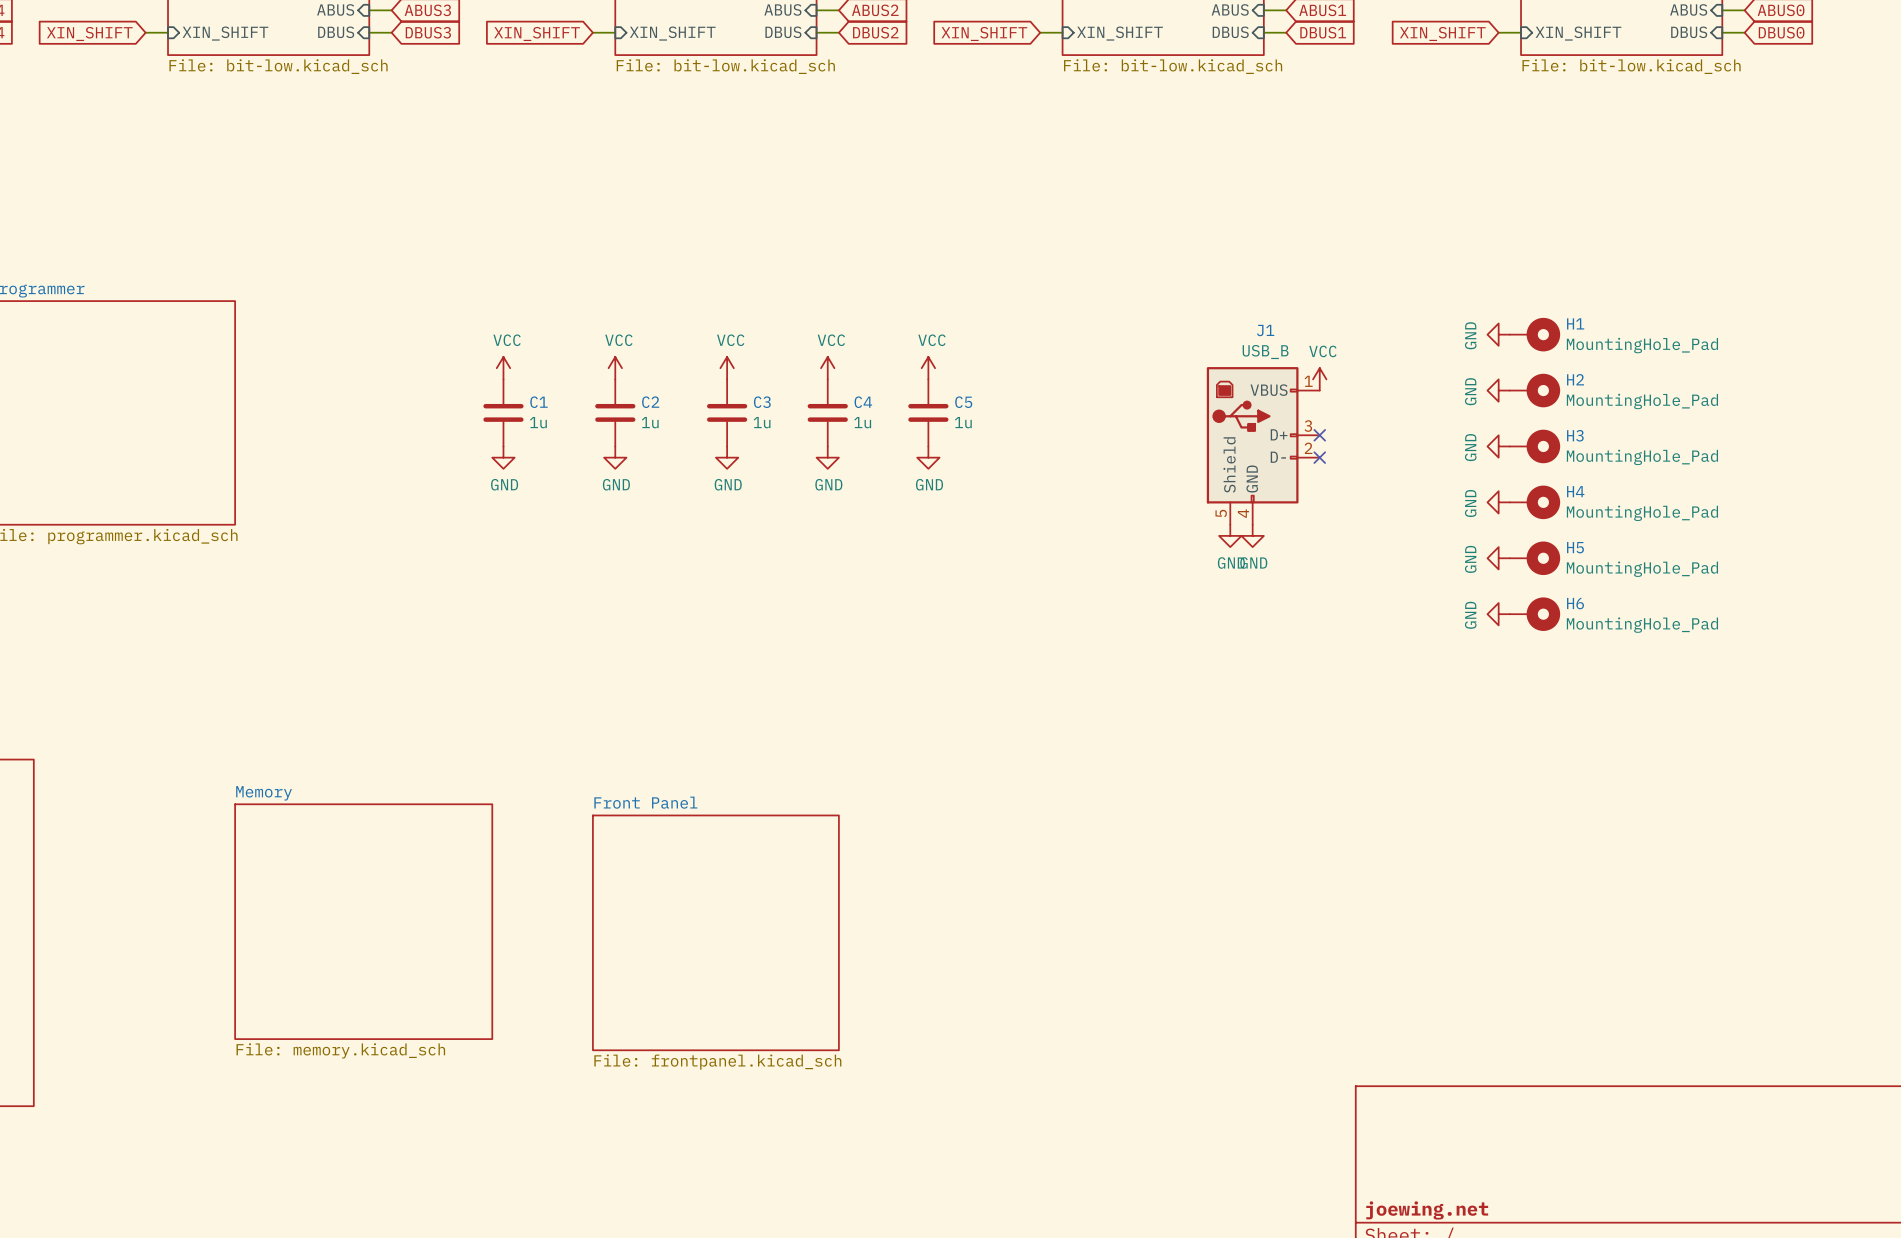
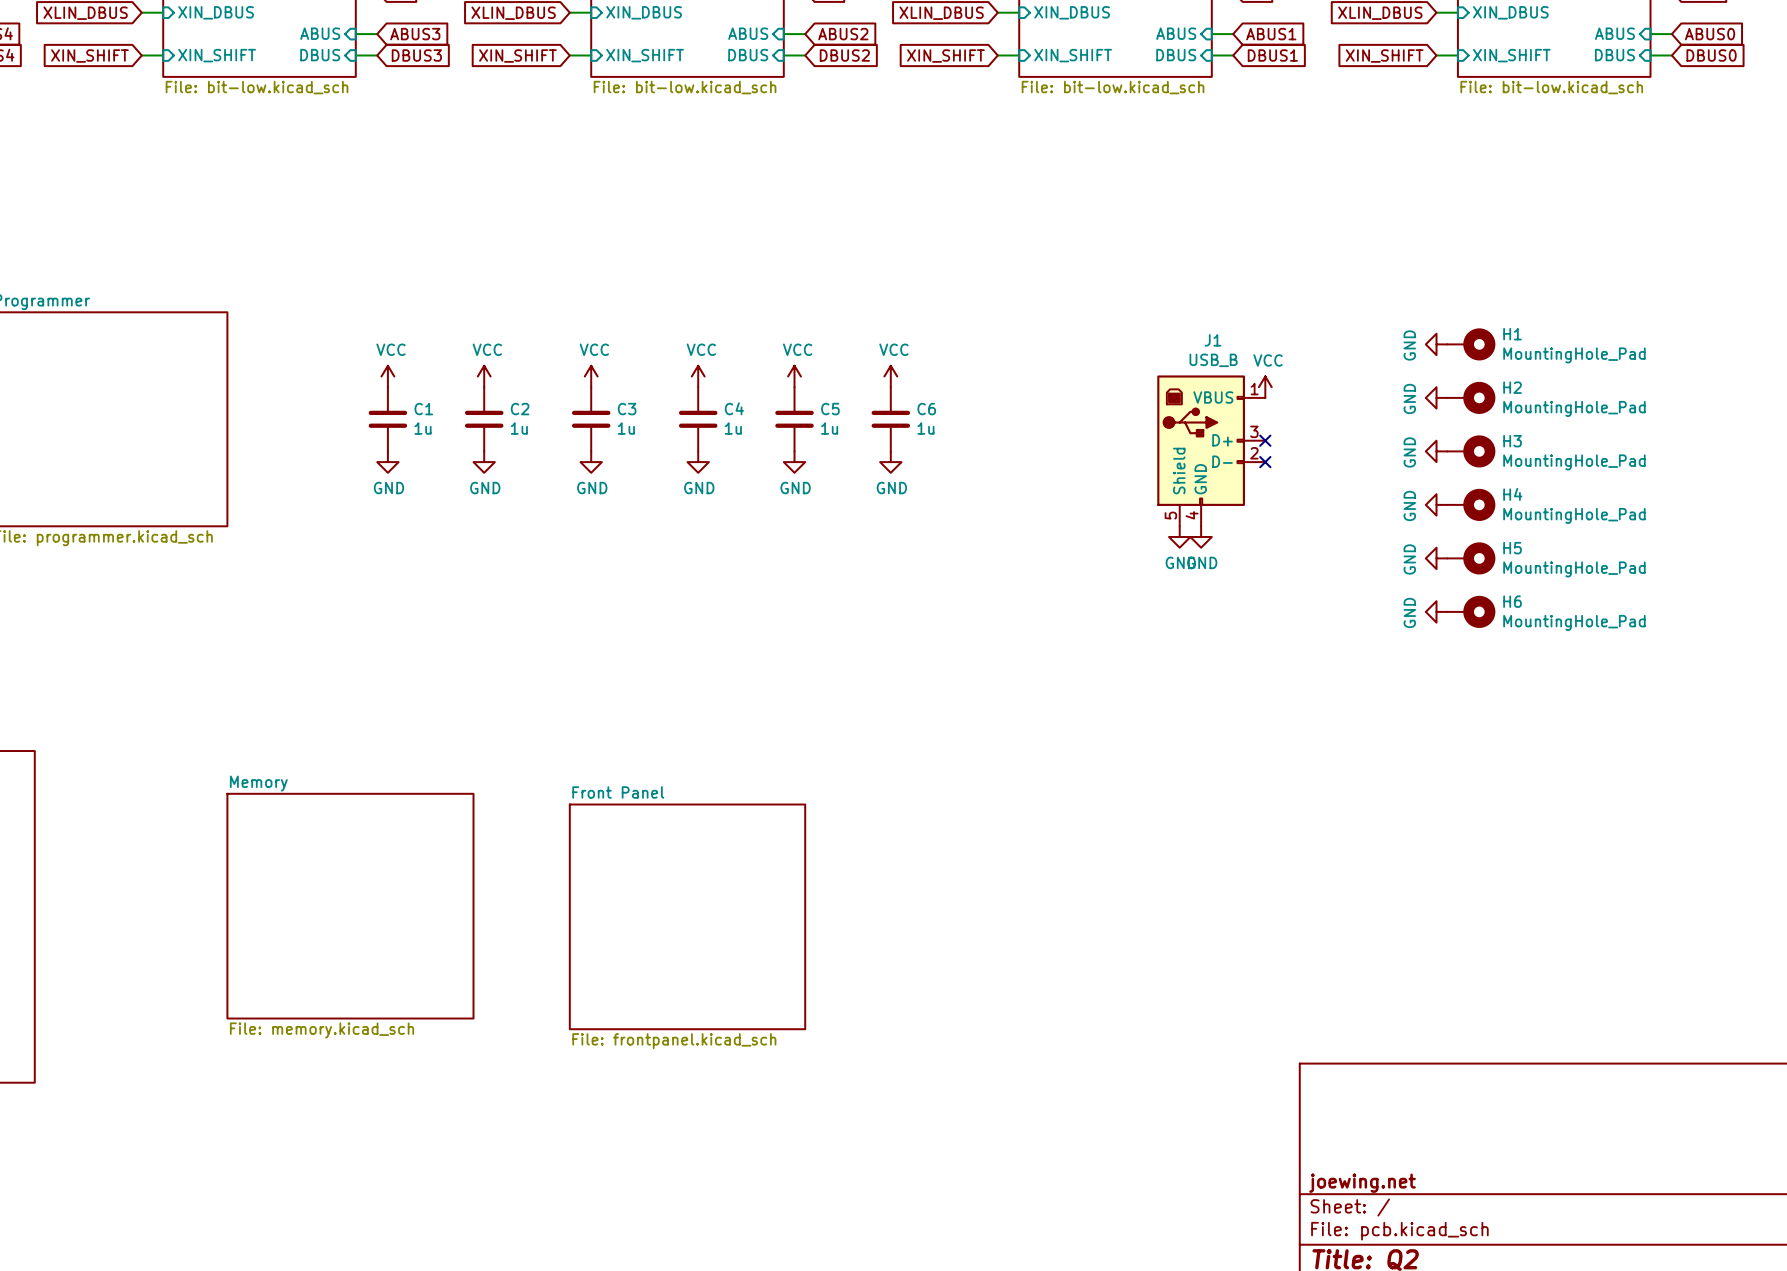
power symbol: none -> VCC (387, 376)
C1 name: C1 (538, 402) -> C2 (520, 409)
C2 name: C2 (650, 402) -> C3 (627, 409)
C3 name: C3 (762, 402) -> C4 (734, 408)
C4 name: C4 (863, 402) -> C5 (830, 409)
C5 name: C5 (963, 402) -> C6 (926, 409)
C1: none -> 1u (387, 419)
power symbol: none -> GND (387, 462)

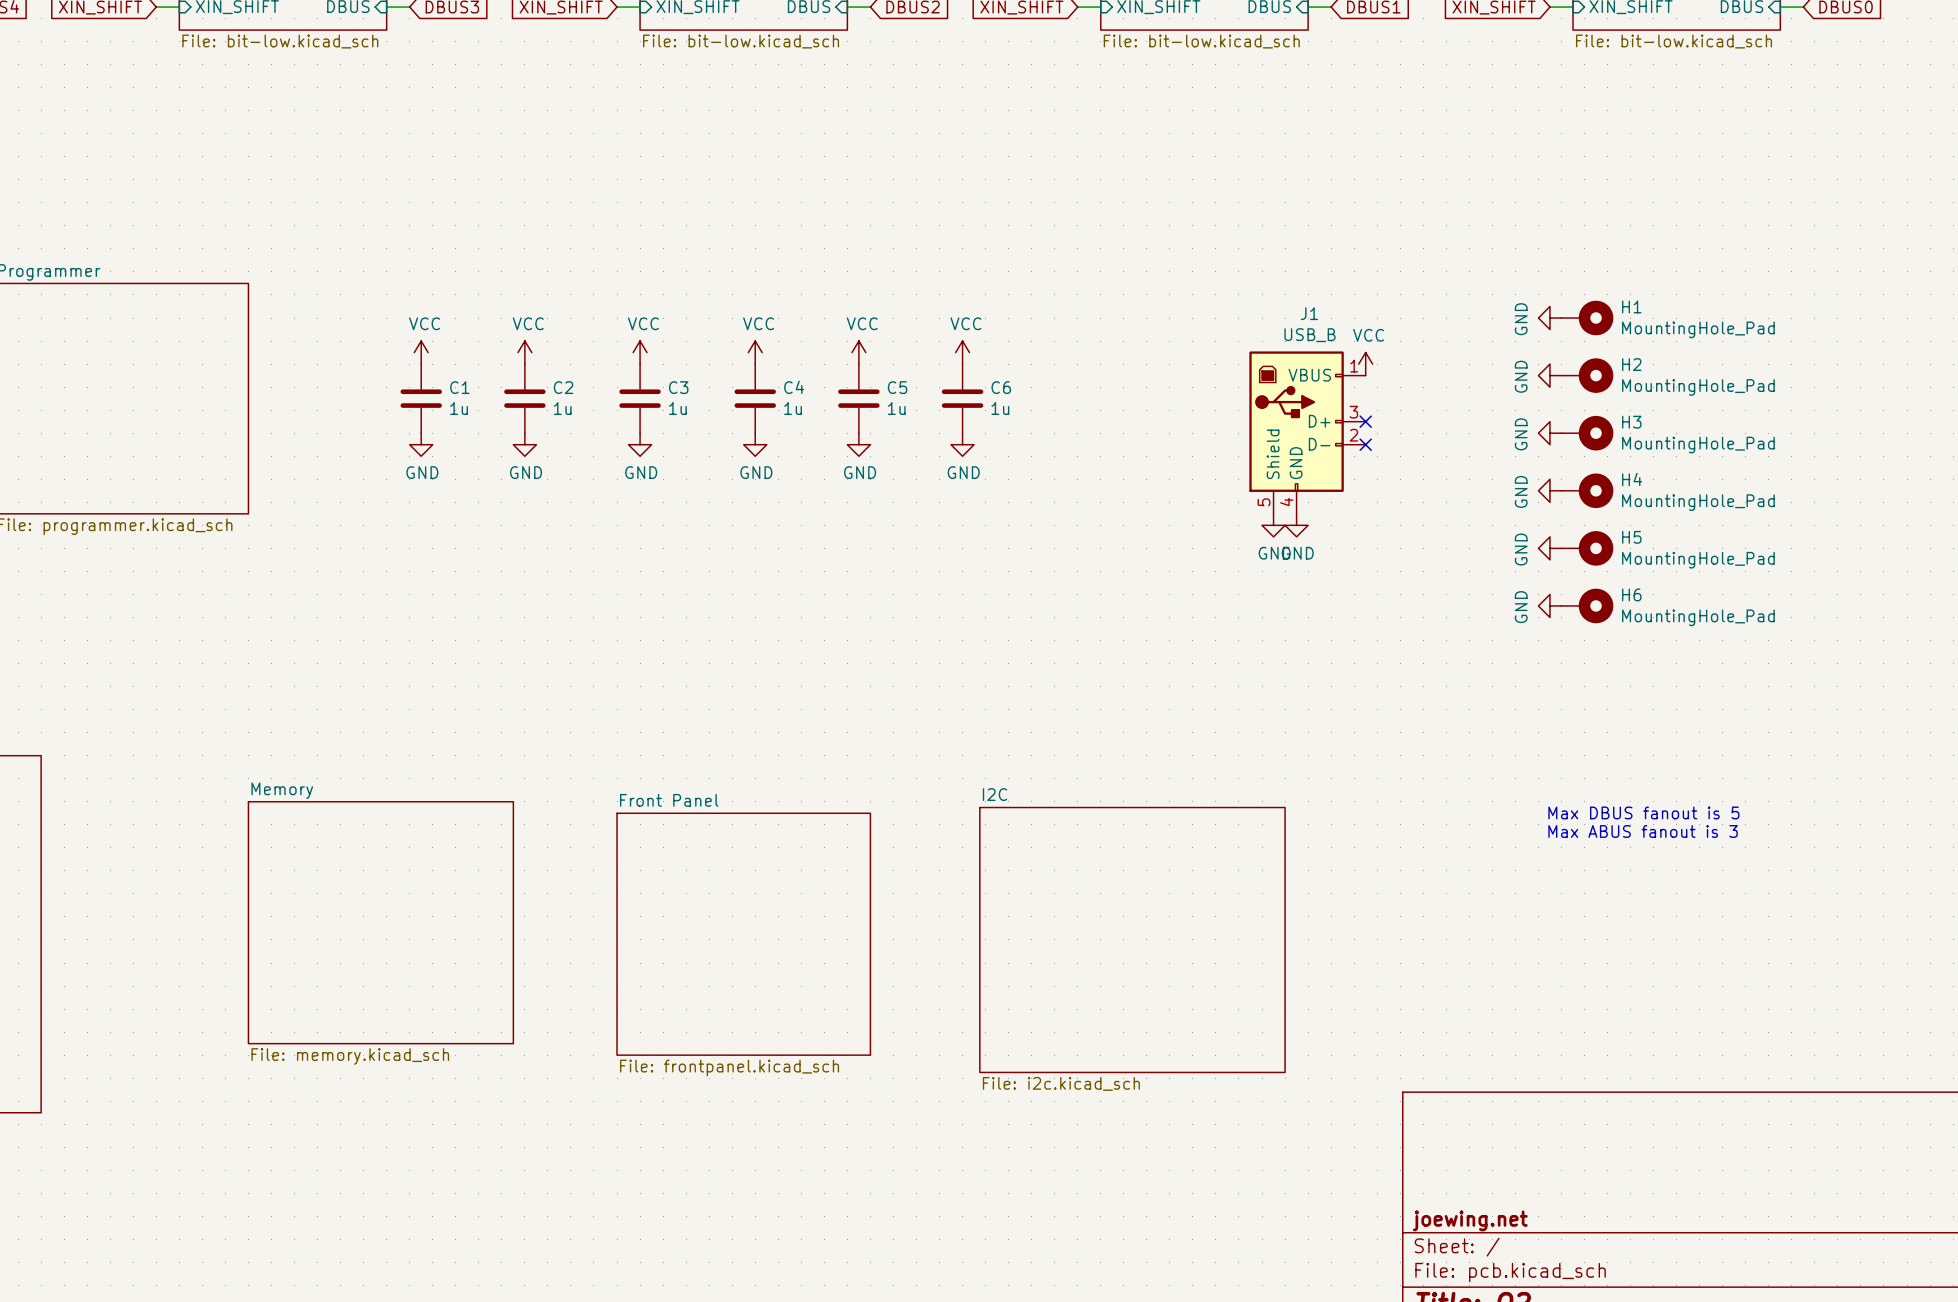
text: none -> Max DBUS fanout is 5 (1643, 812)
text: none -> Max ABUS fanout is 3 (1643, 831)
sheet I2C: none -> File: i2c.kicad_sch (1132, 939)

